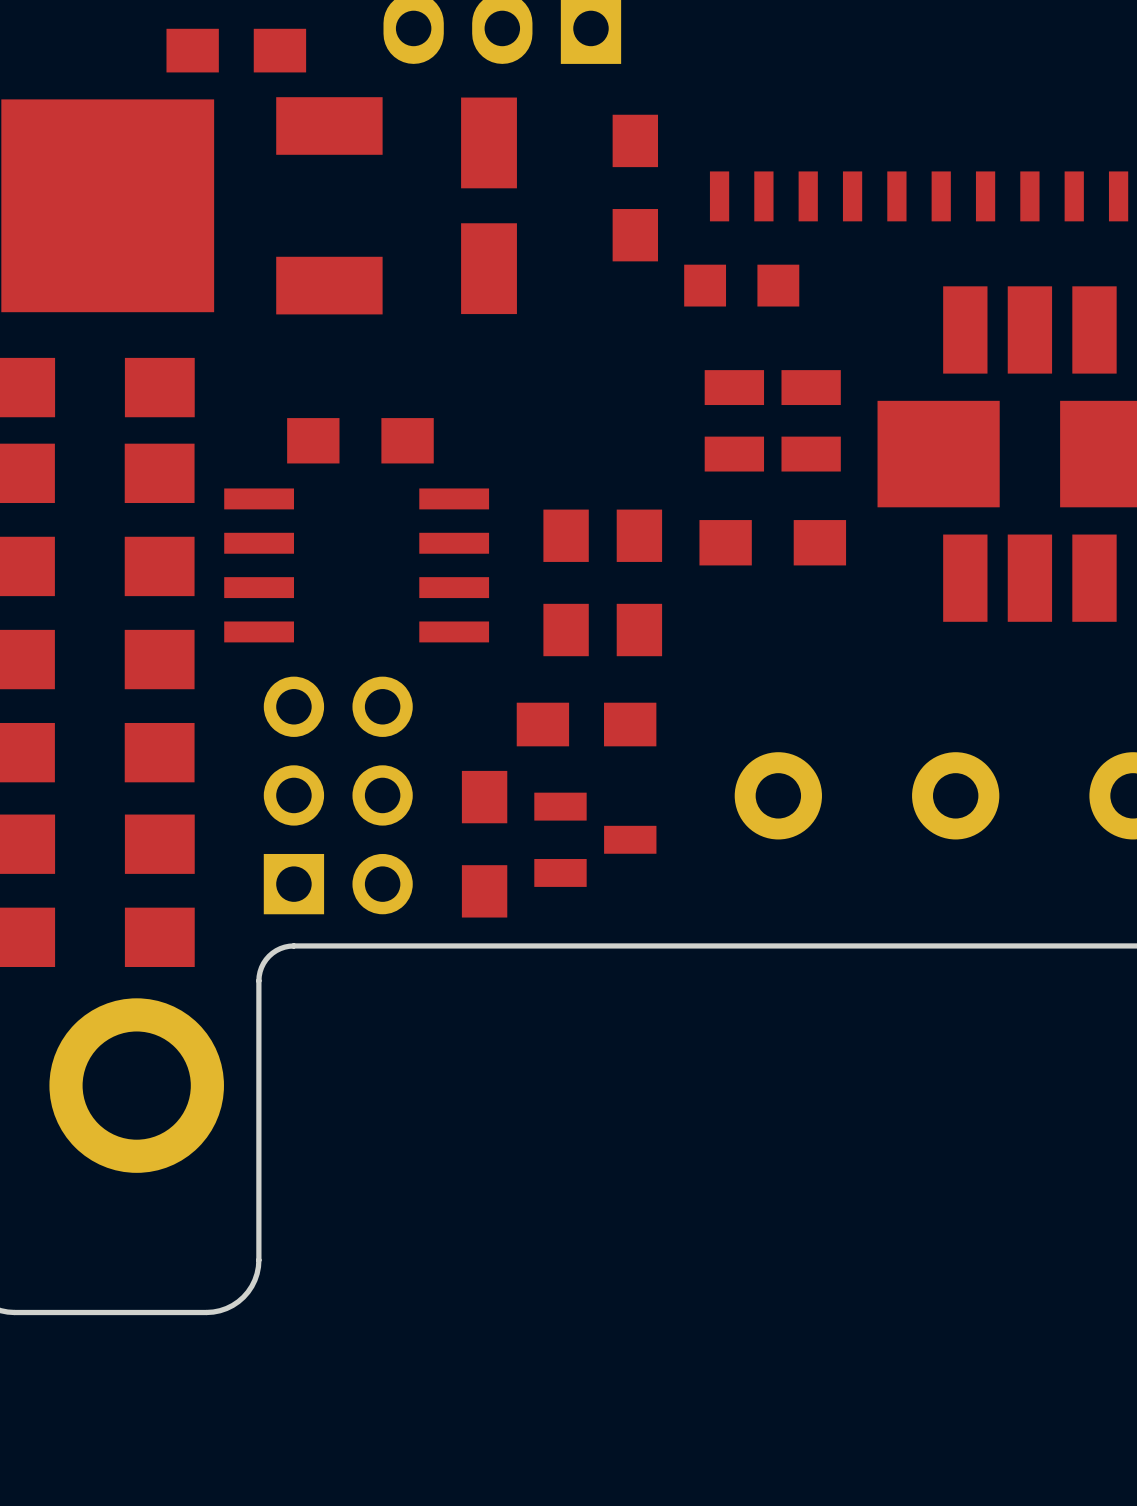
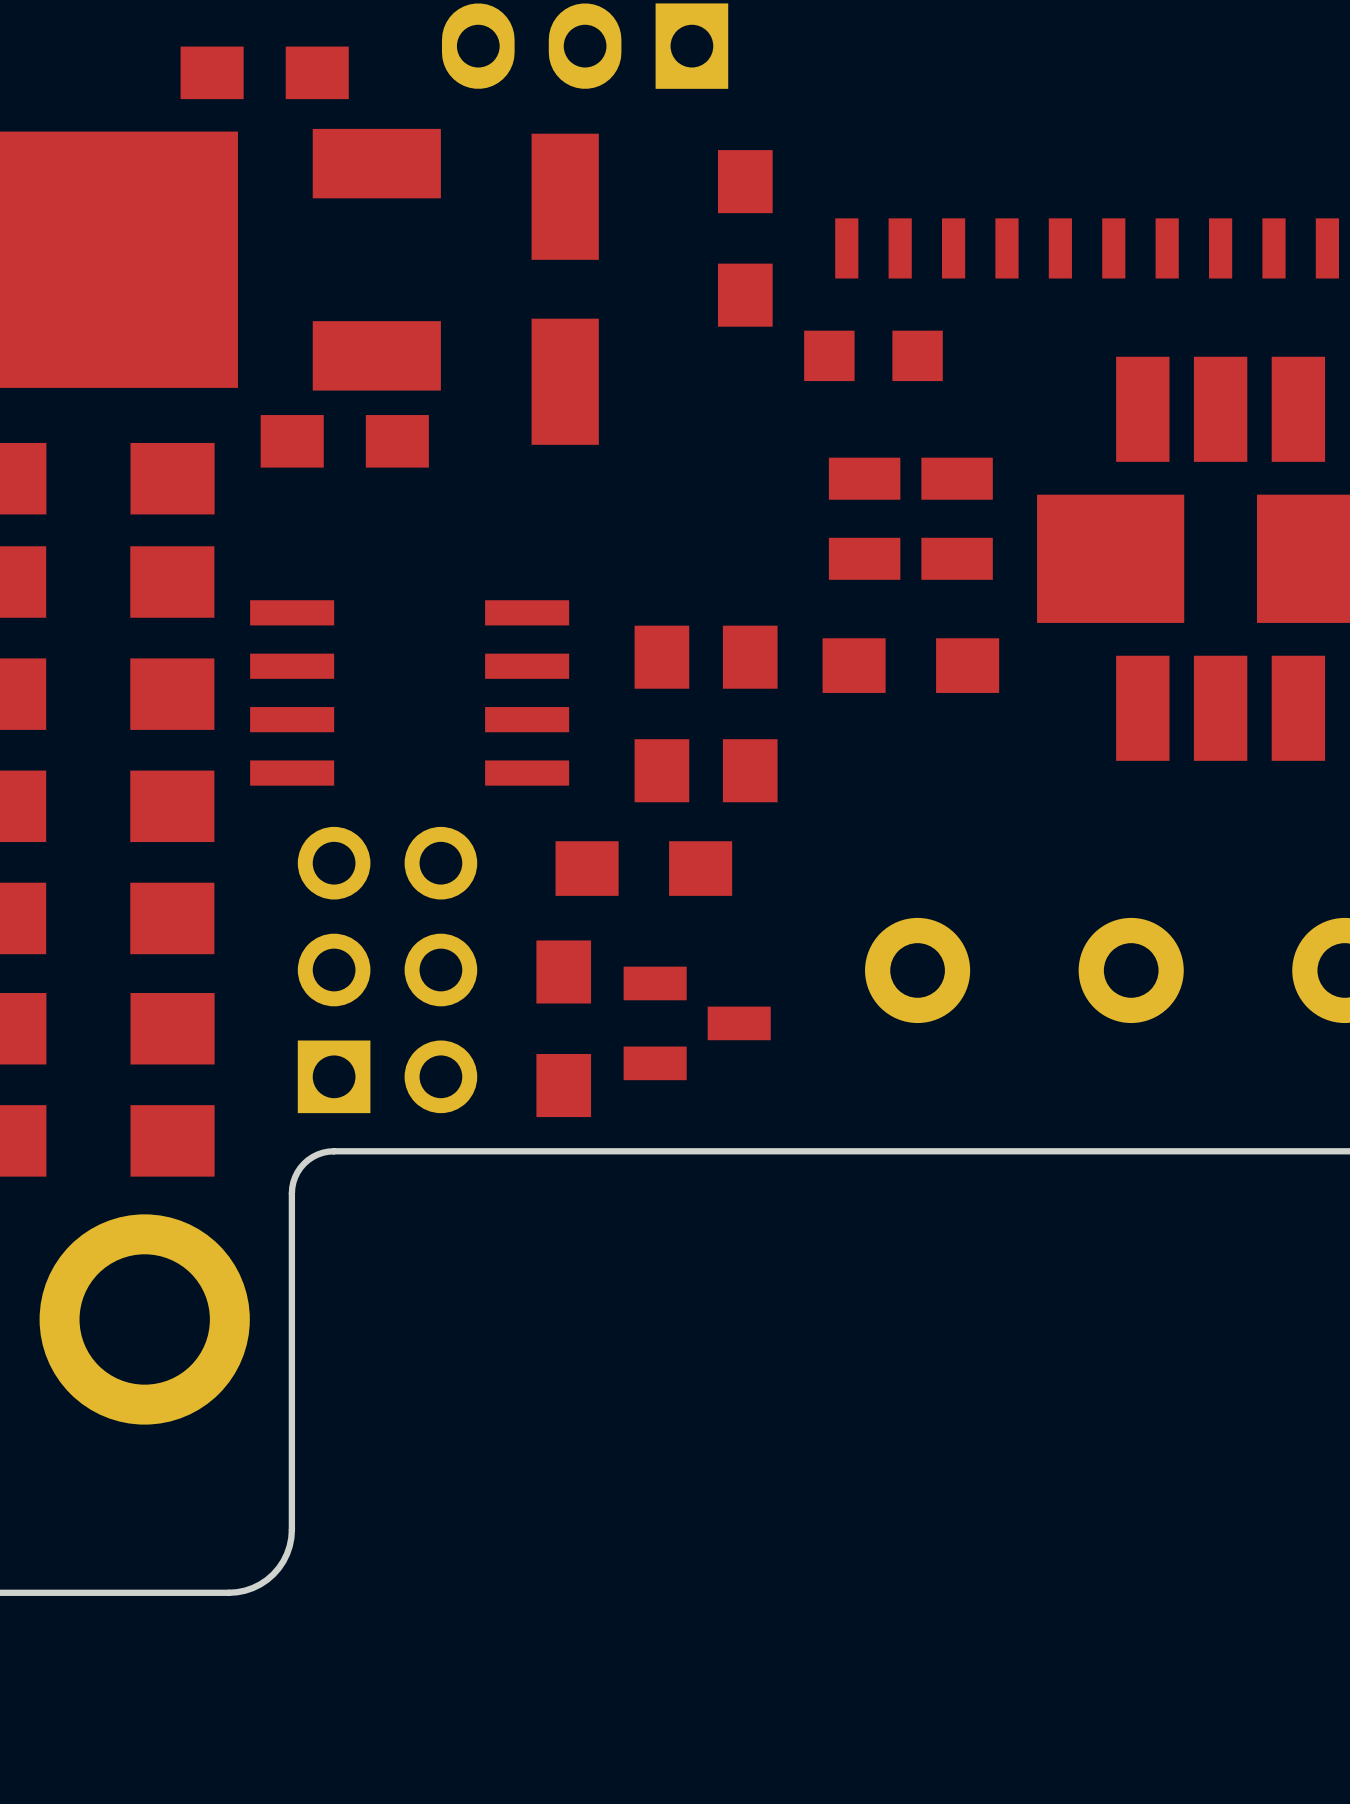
part footprint: [461, 97, 517, 315] -> [531, 133, 599, 445]
part position: (360, 440) -> (643, 868)
part position: (586, 724) -> (344, 441)

